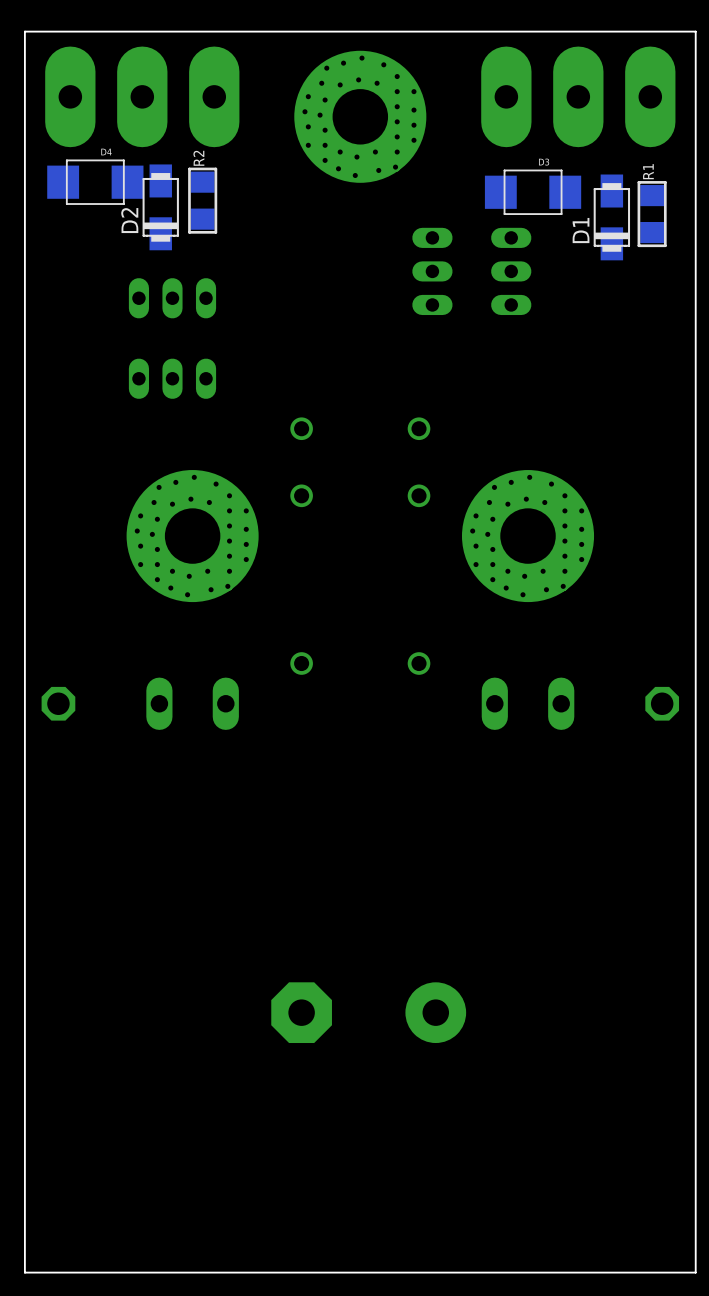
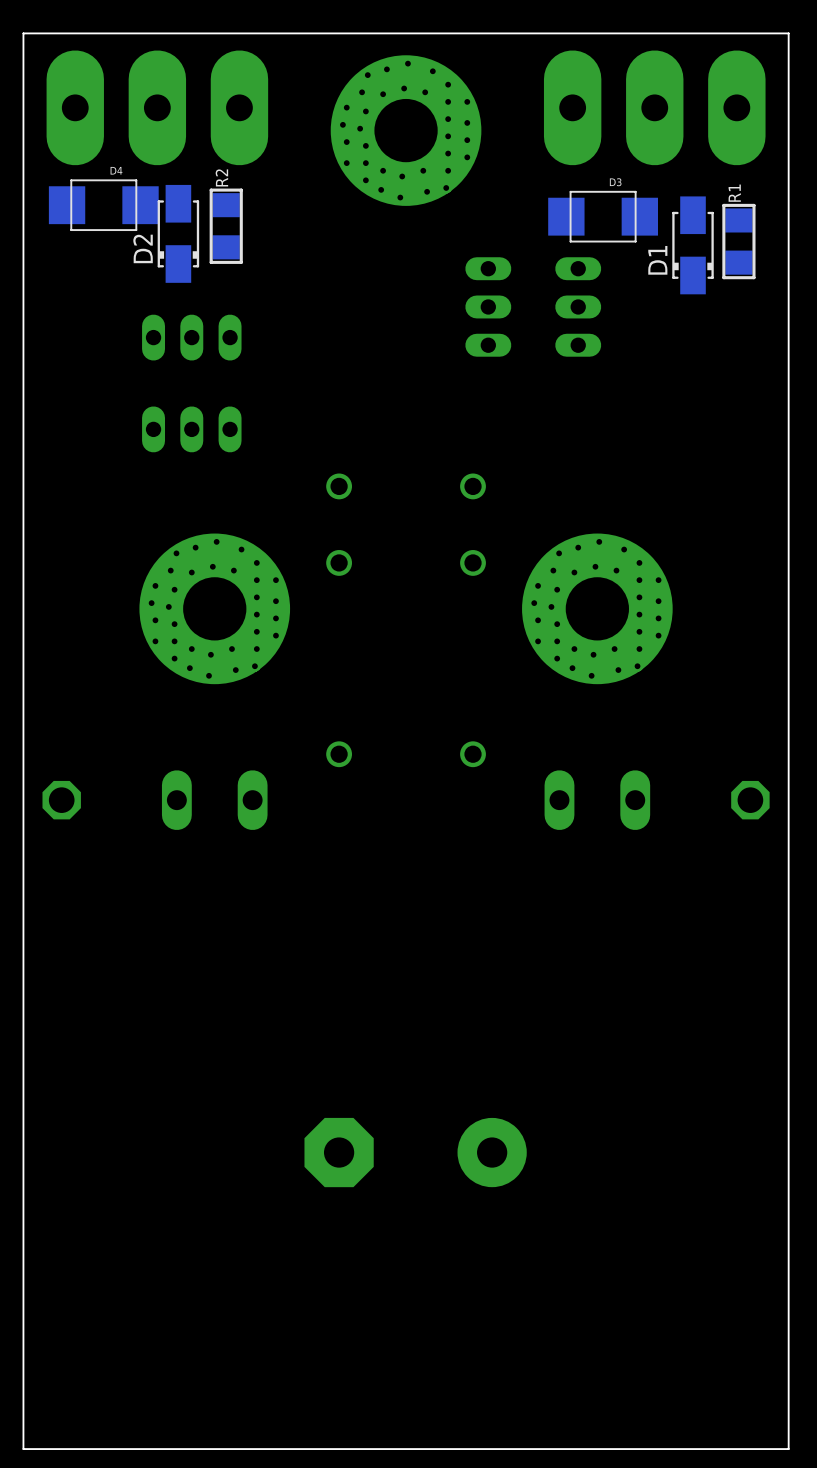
D2 footprint: [142, 164, 179, 251] -> [157, 184, 200, 283]
D1 footprint: [593, 174, 631, 261] -> [672, 196, 714, 295]

